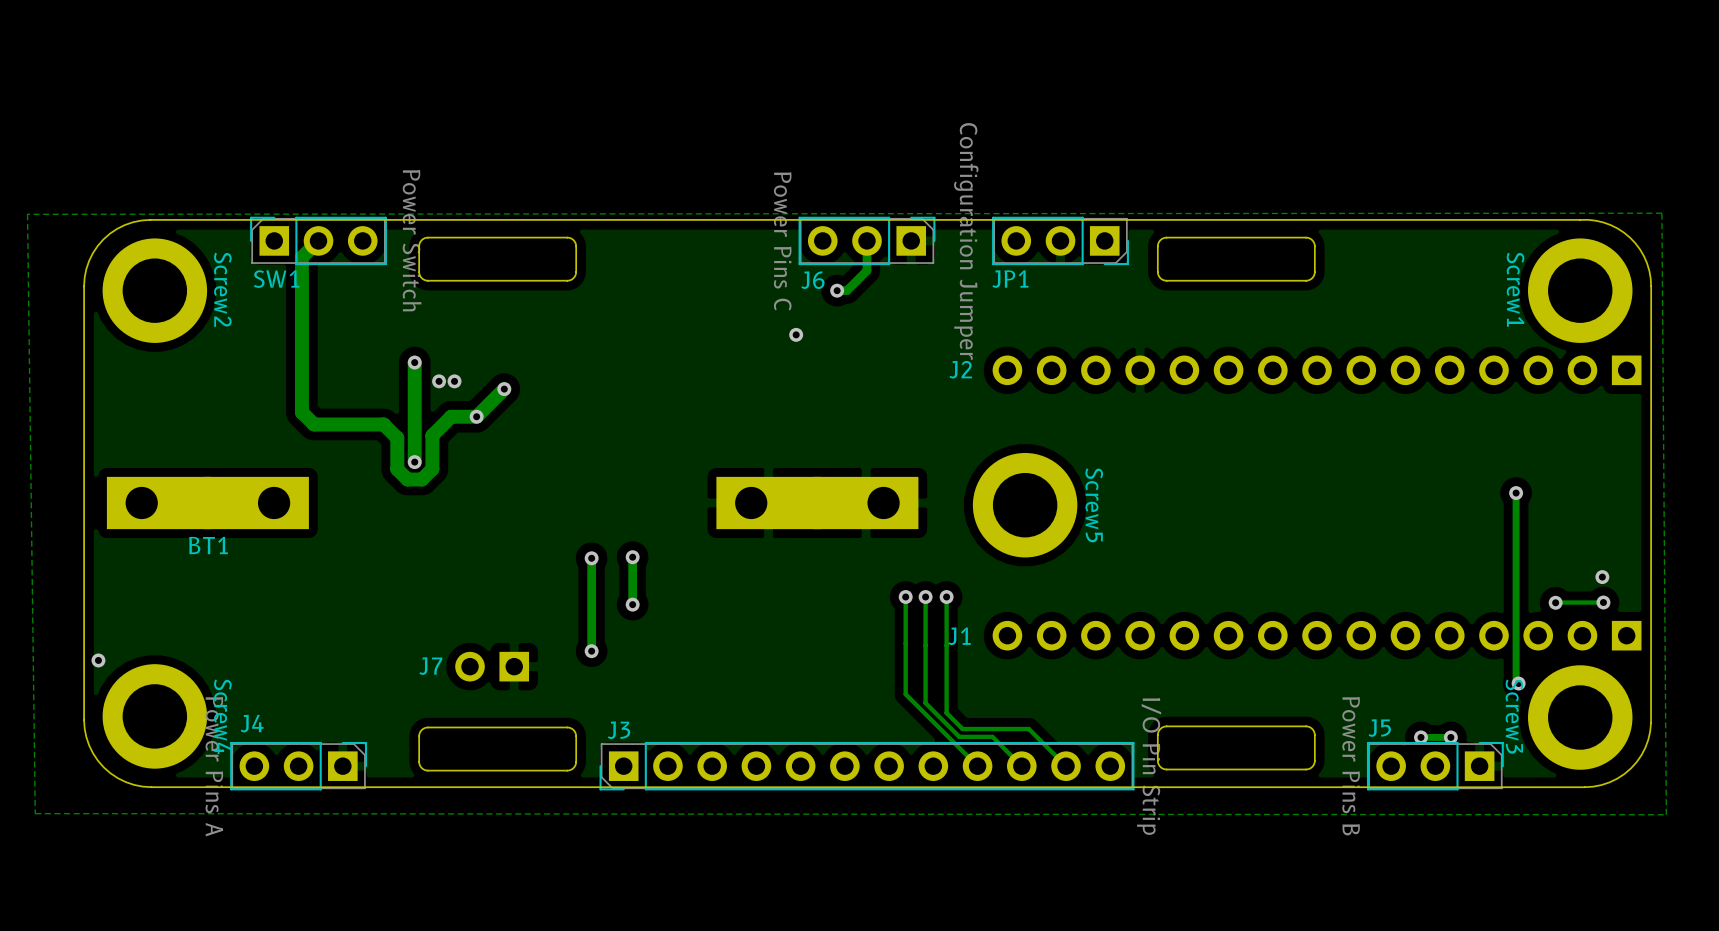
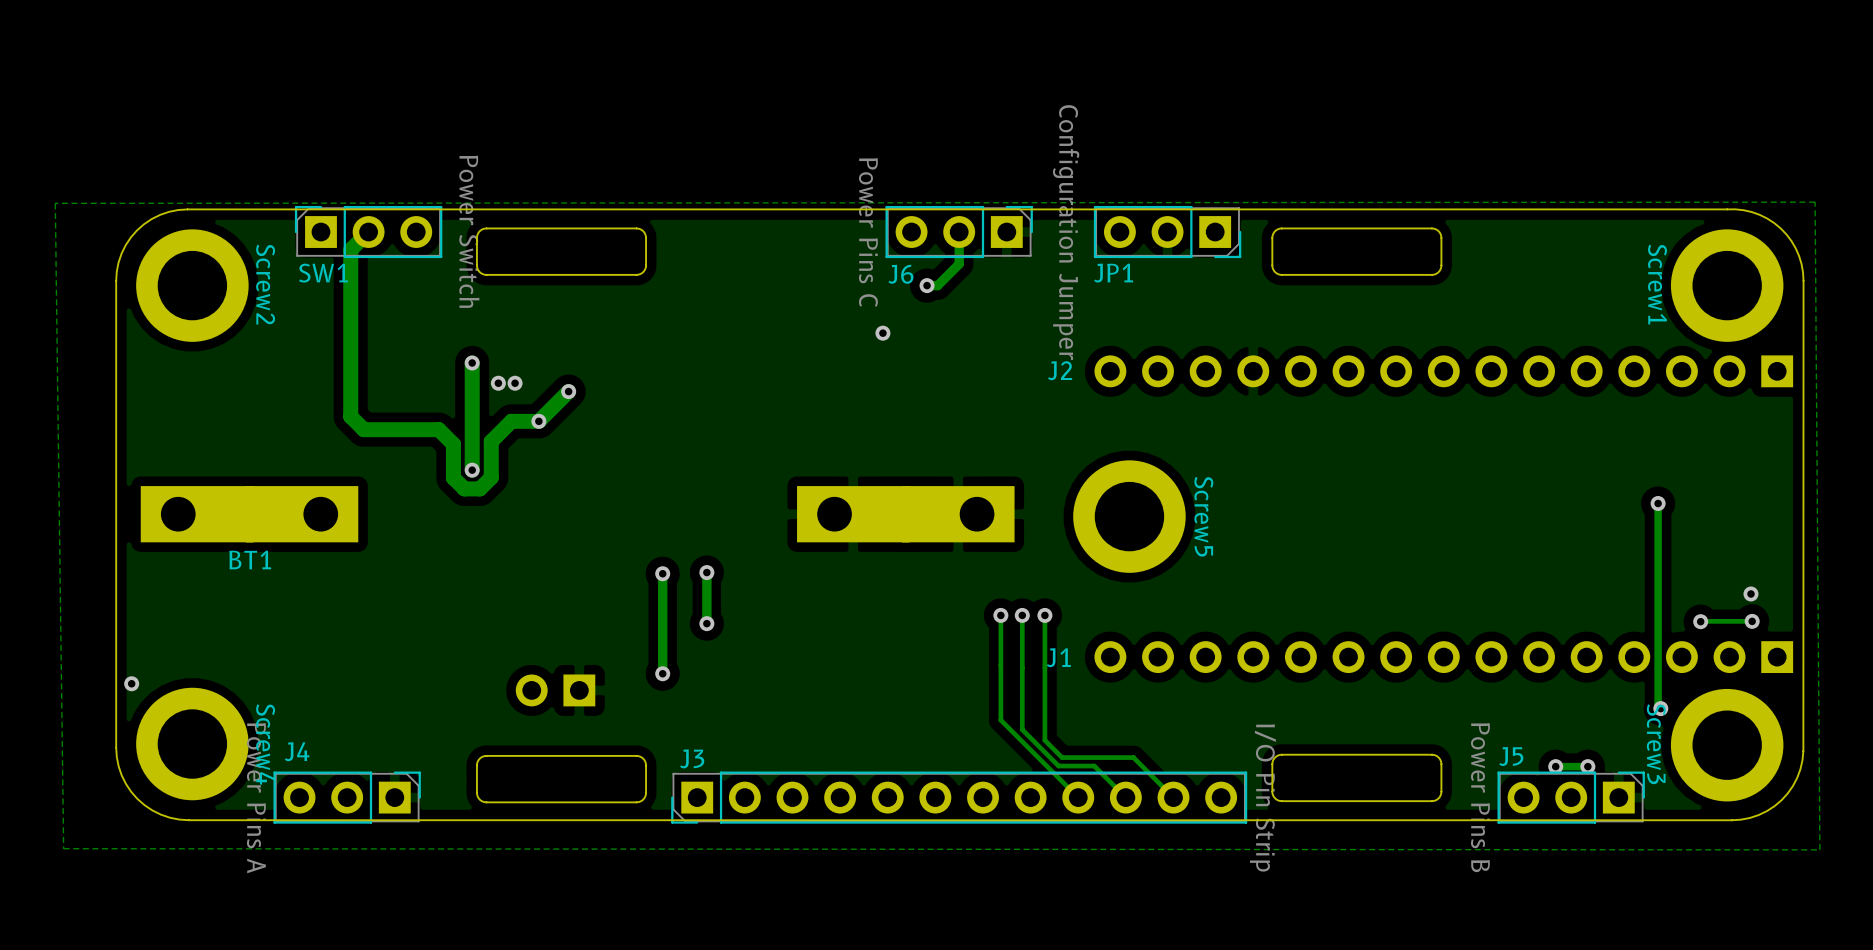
J7 name: J7 (430, 666) -> none

